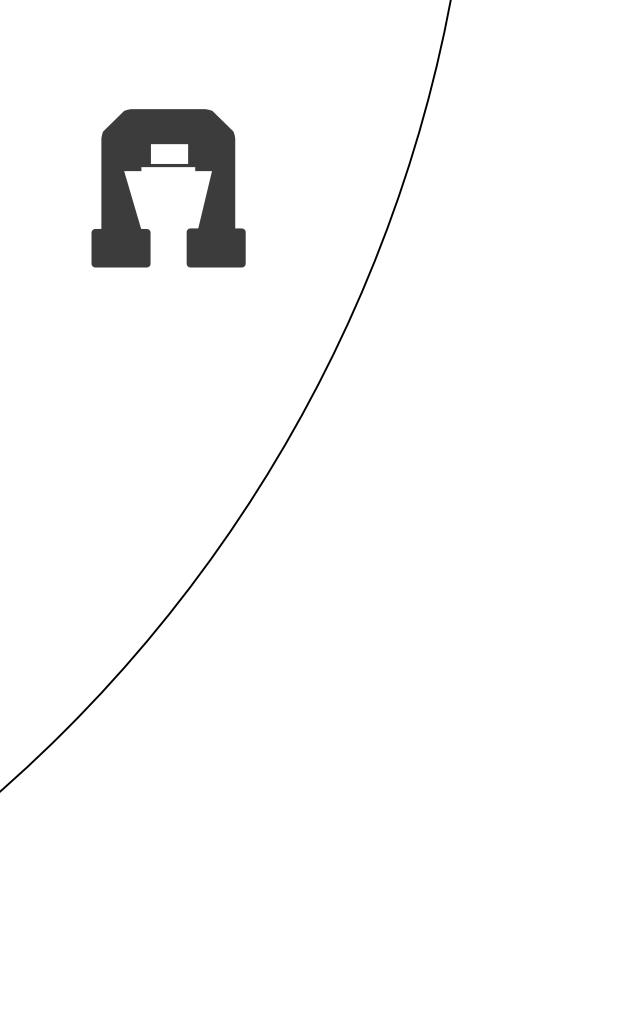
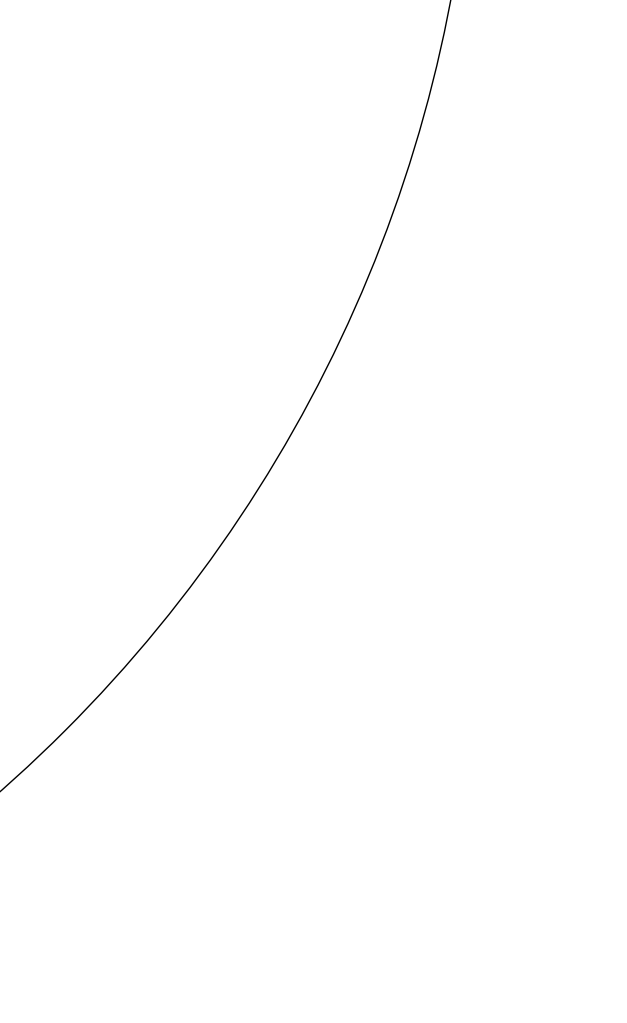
drawing: [91, 109, 246, 268] -> none

